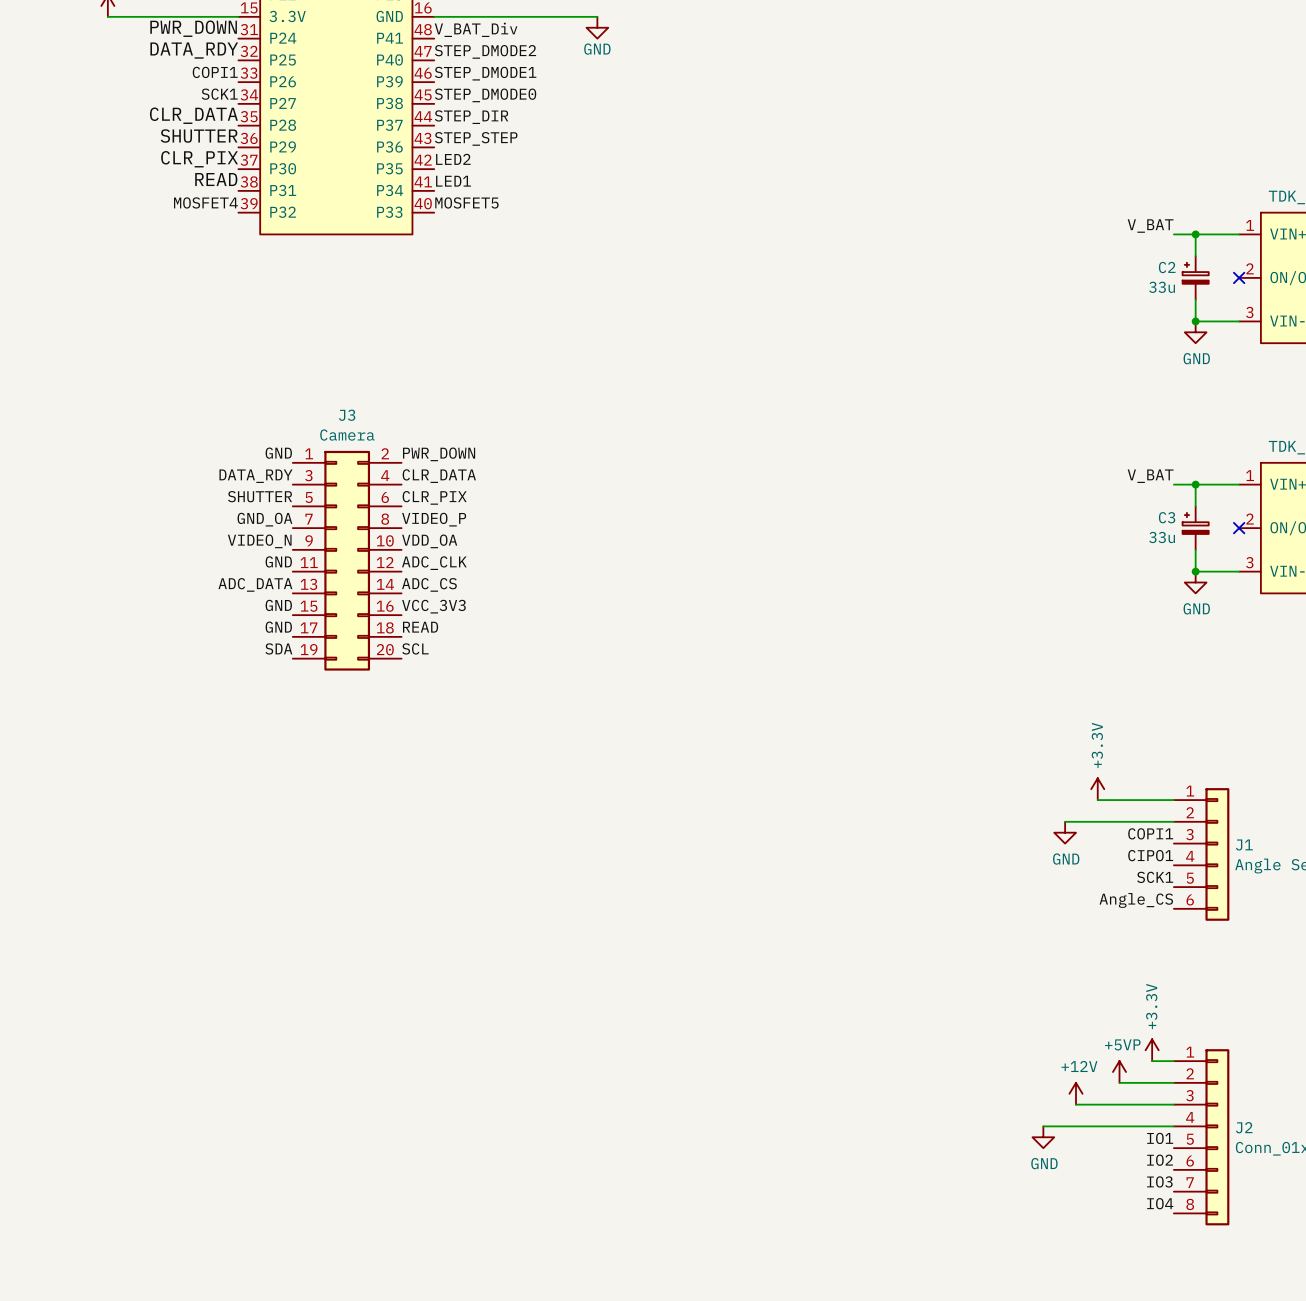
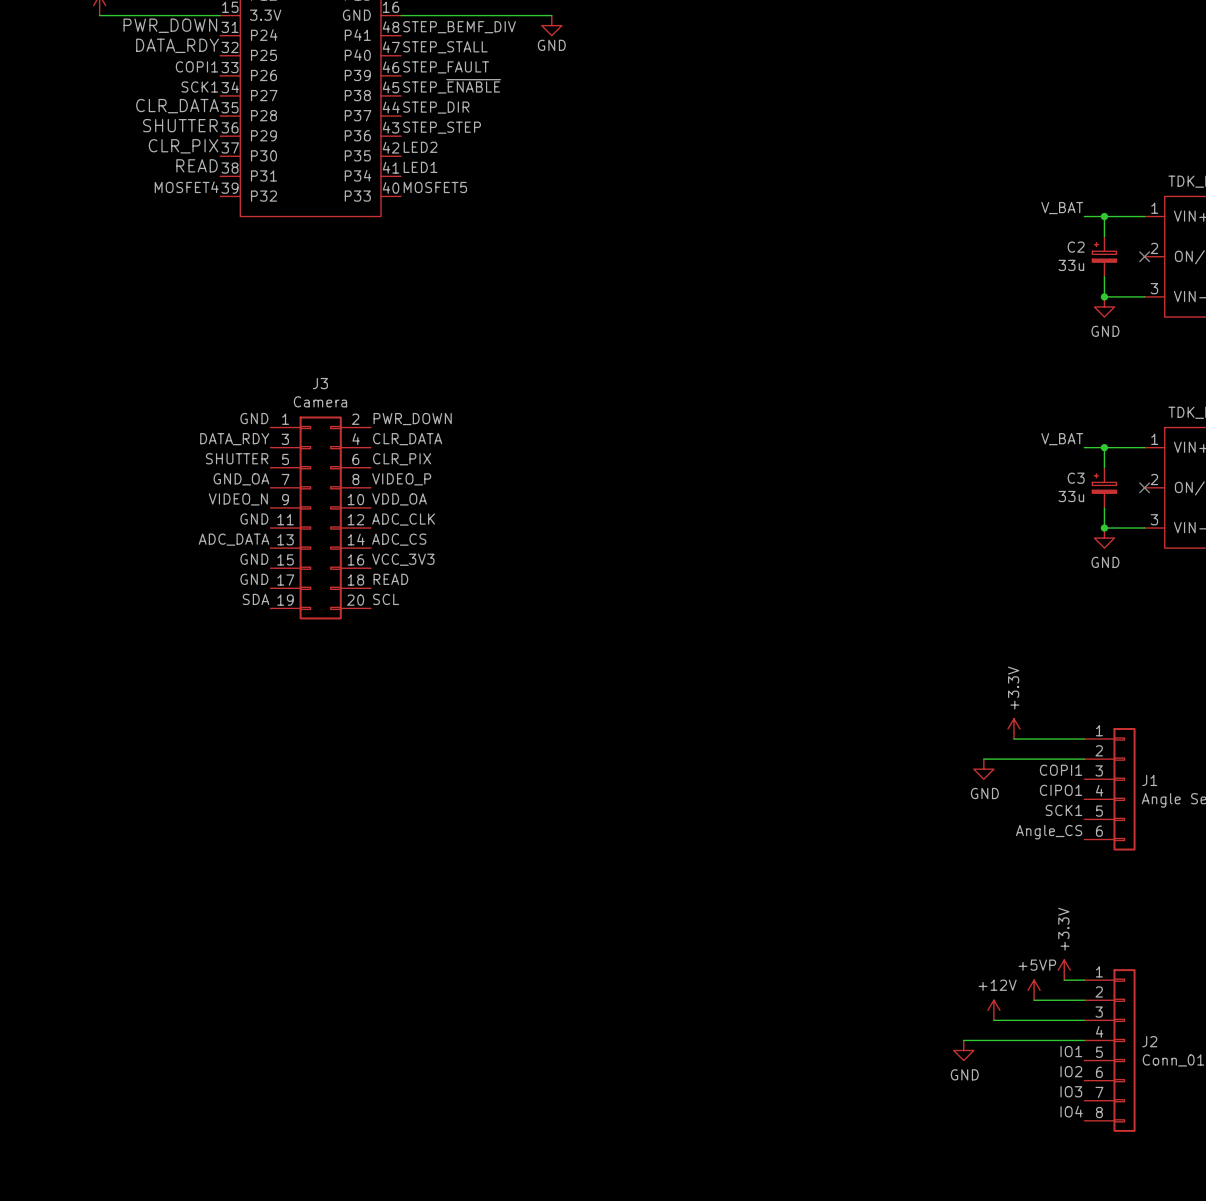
label: V_BAT_Div (476, 29) -> STEP_BEMF_DIV (459, 27)
label: STEP_DMODE2 (485, 51) -> STEP_STALL (445, 47)
label: STEP_DMODE1 (485, 73) -> STEP_FAULT (446, 67)
label: STEP_DMODE0 (485, 95) -> STEP_~{ENABLE} (452, 86)

